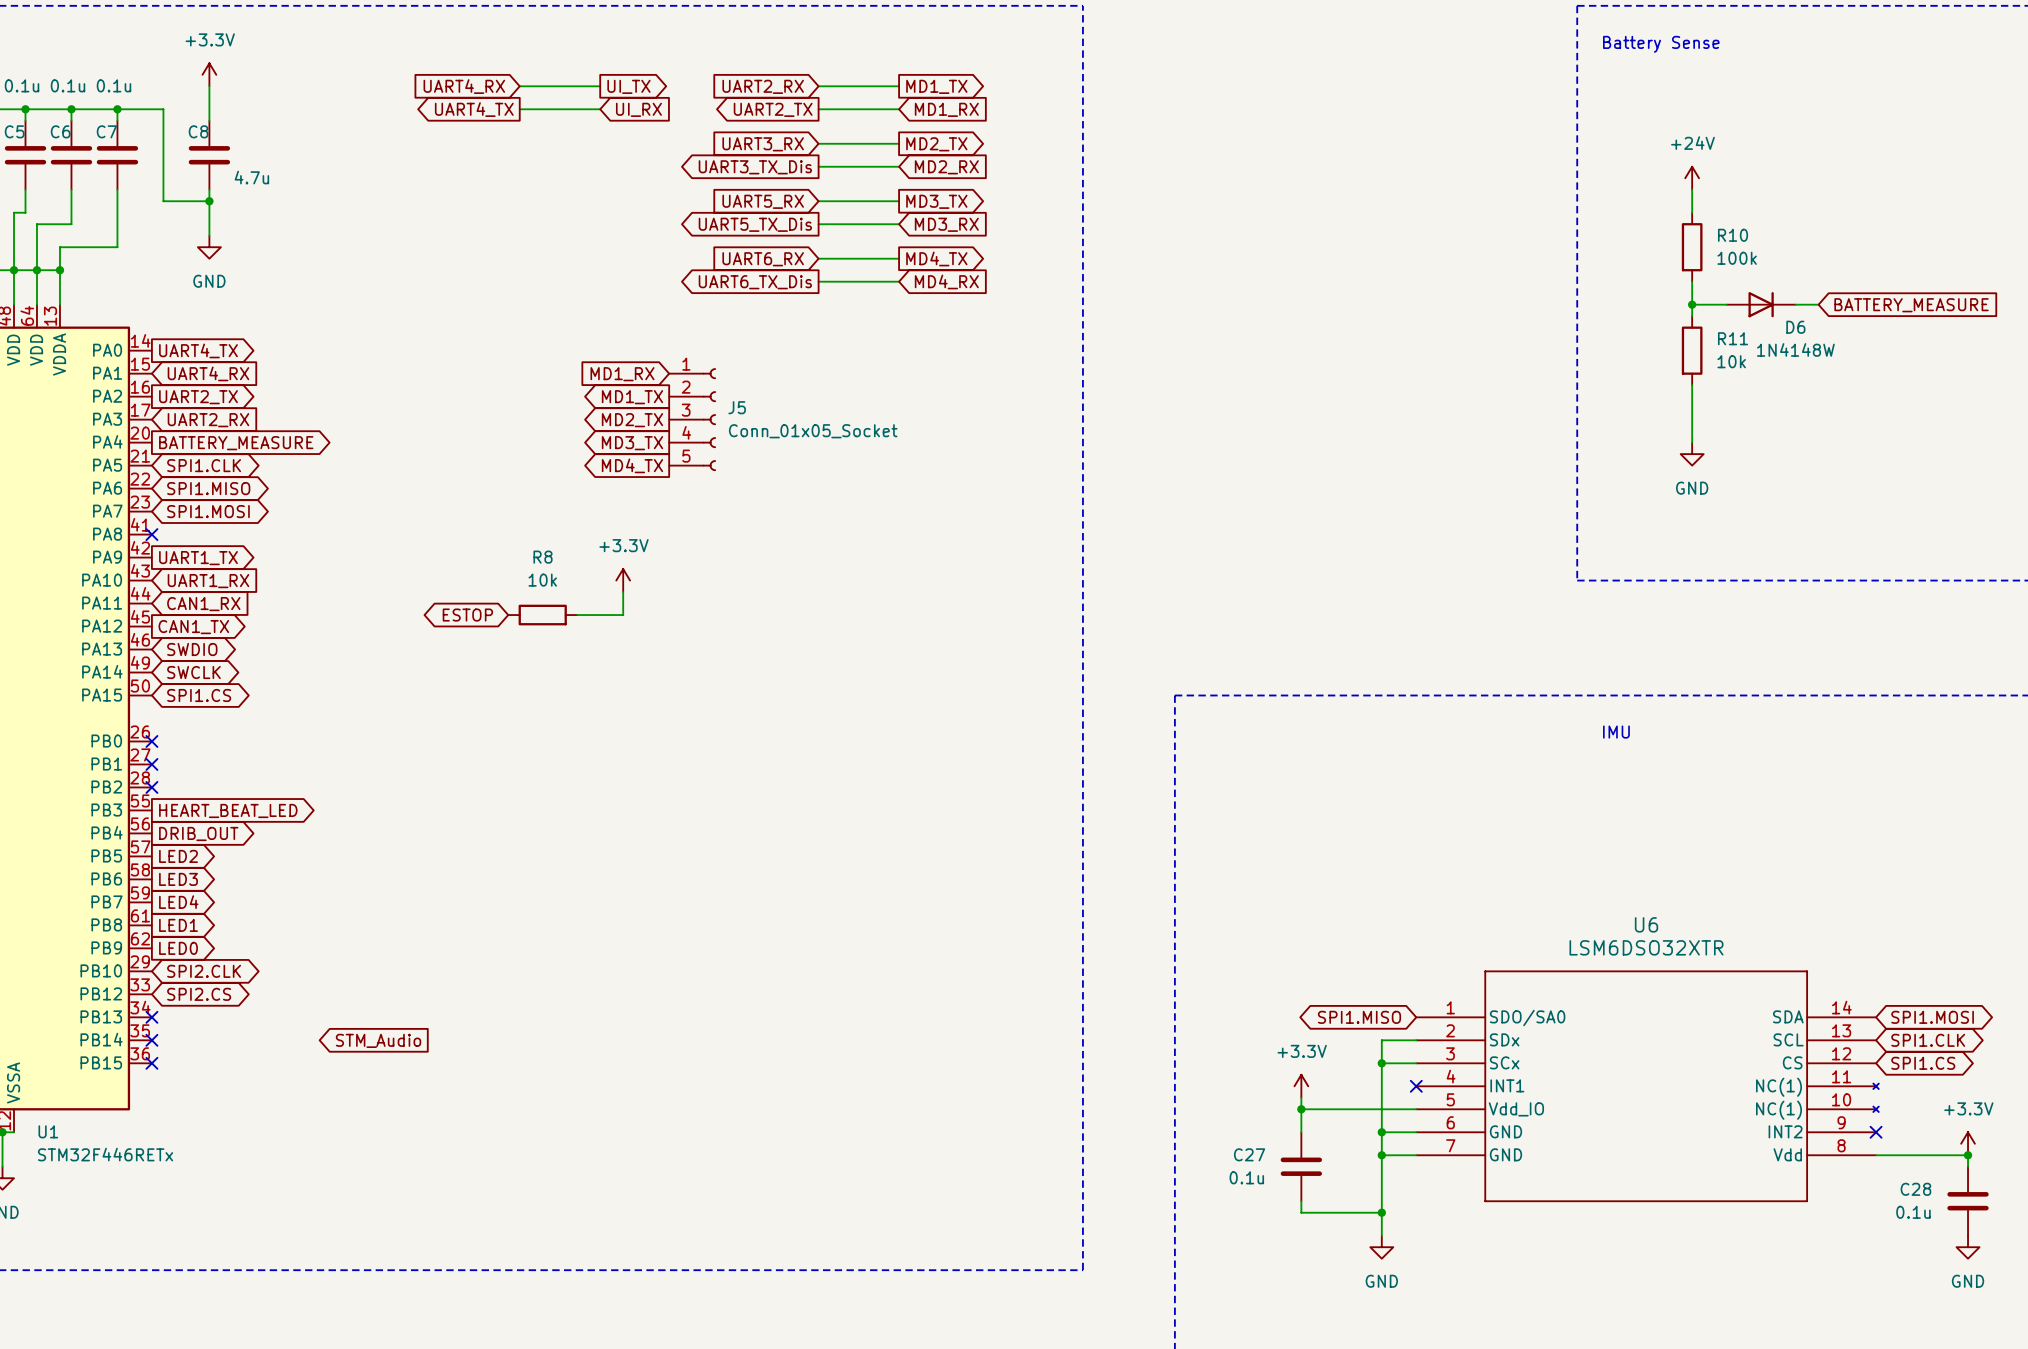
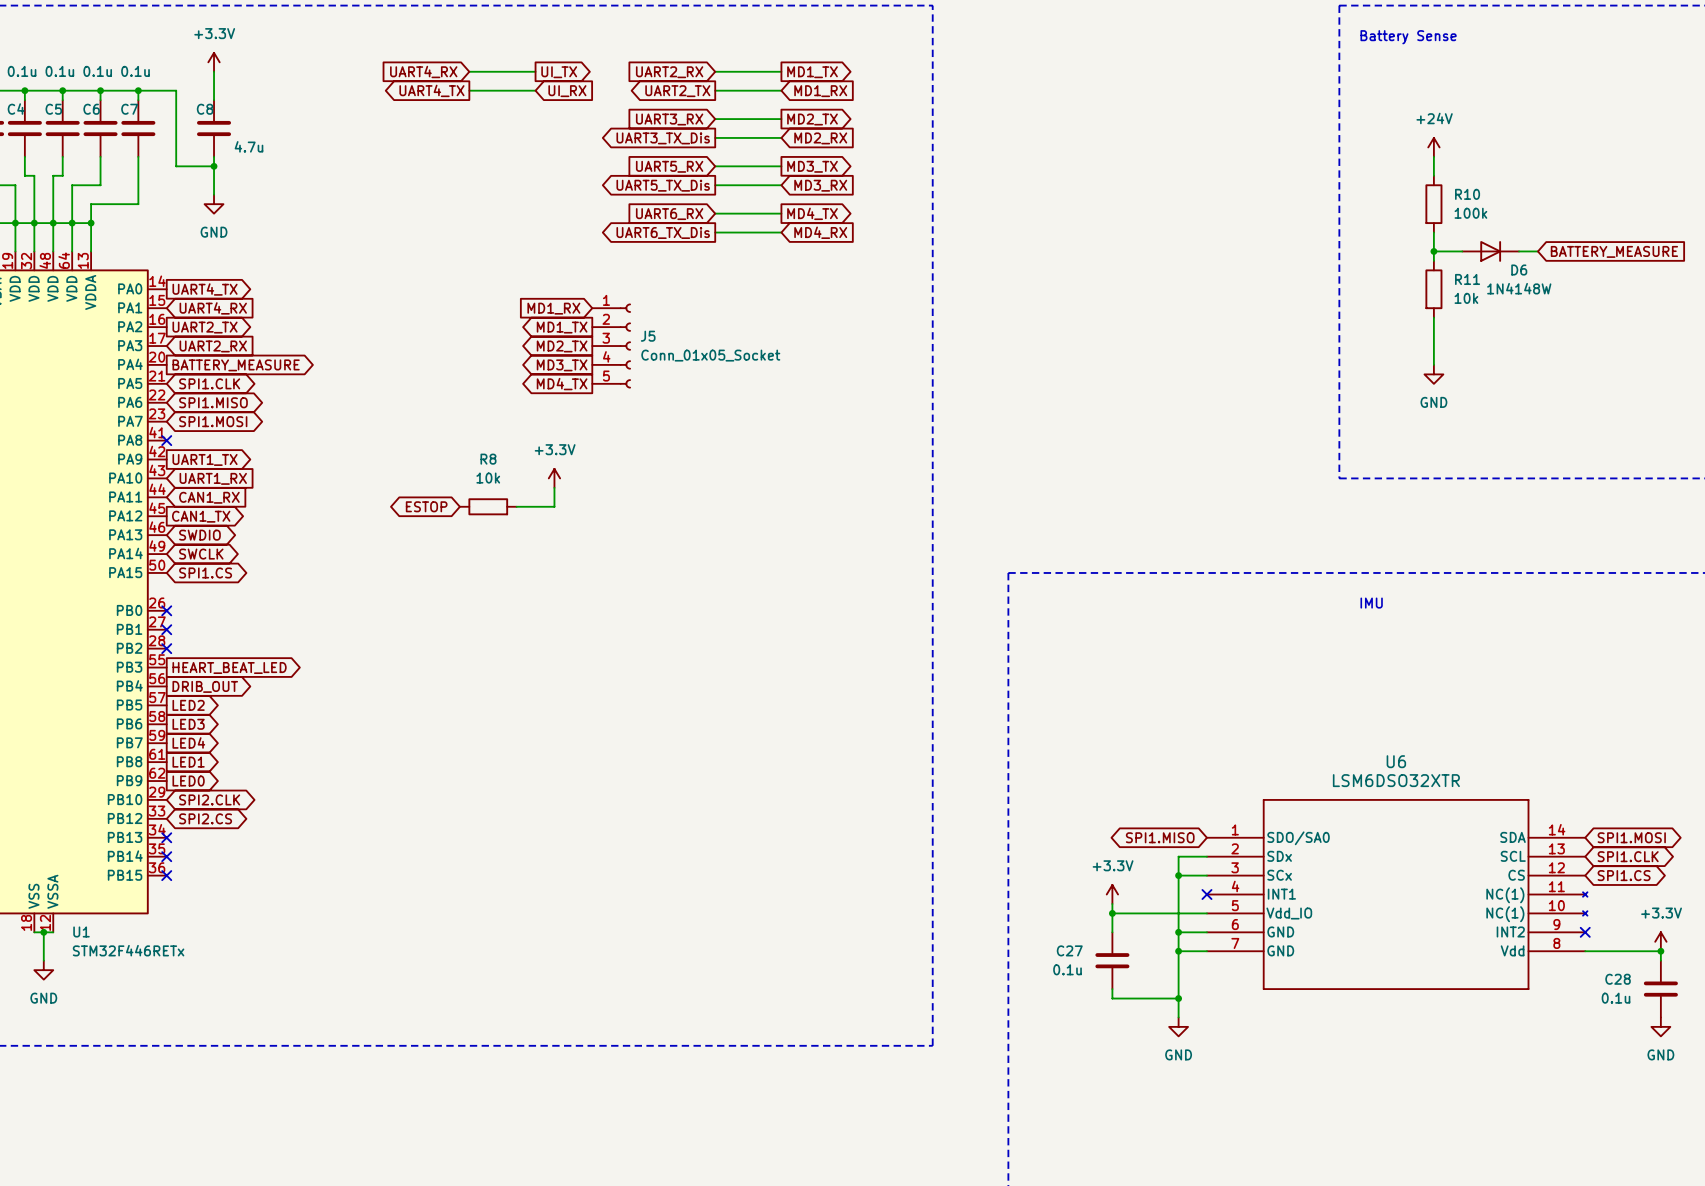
global label: STM_Audio (378, 1040) -> none

